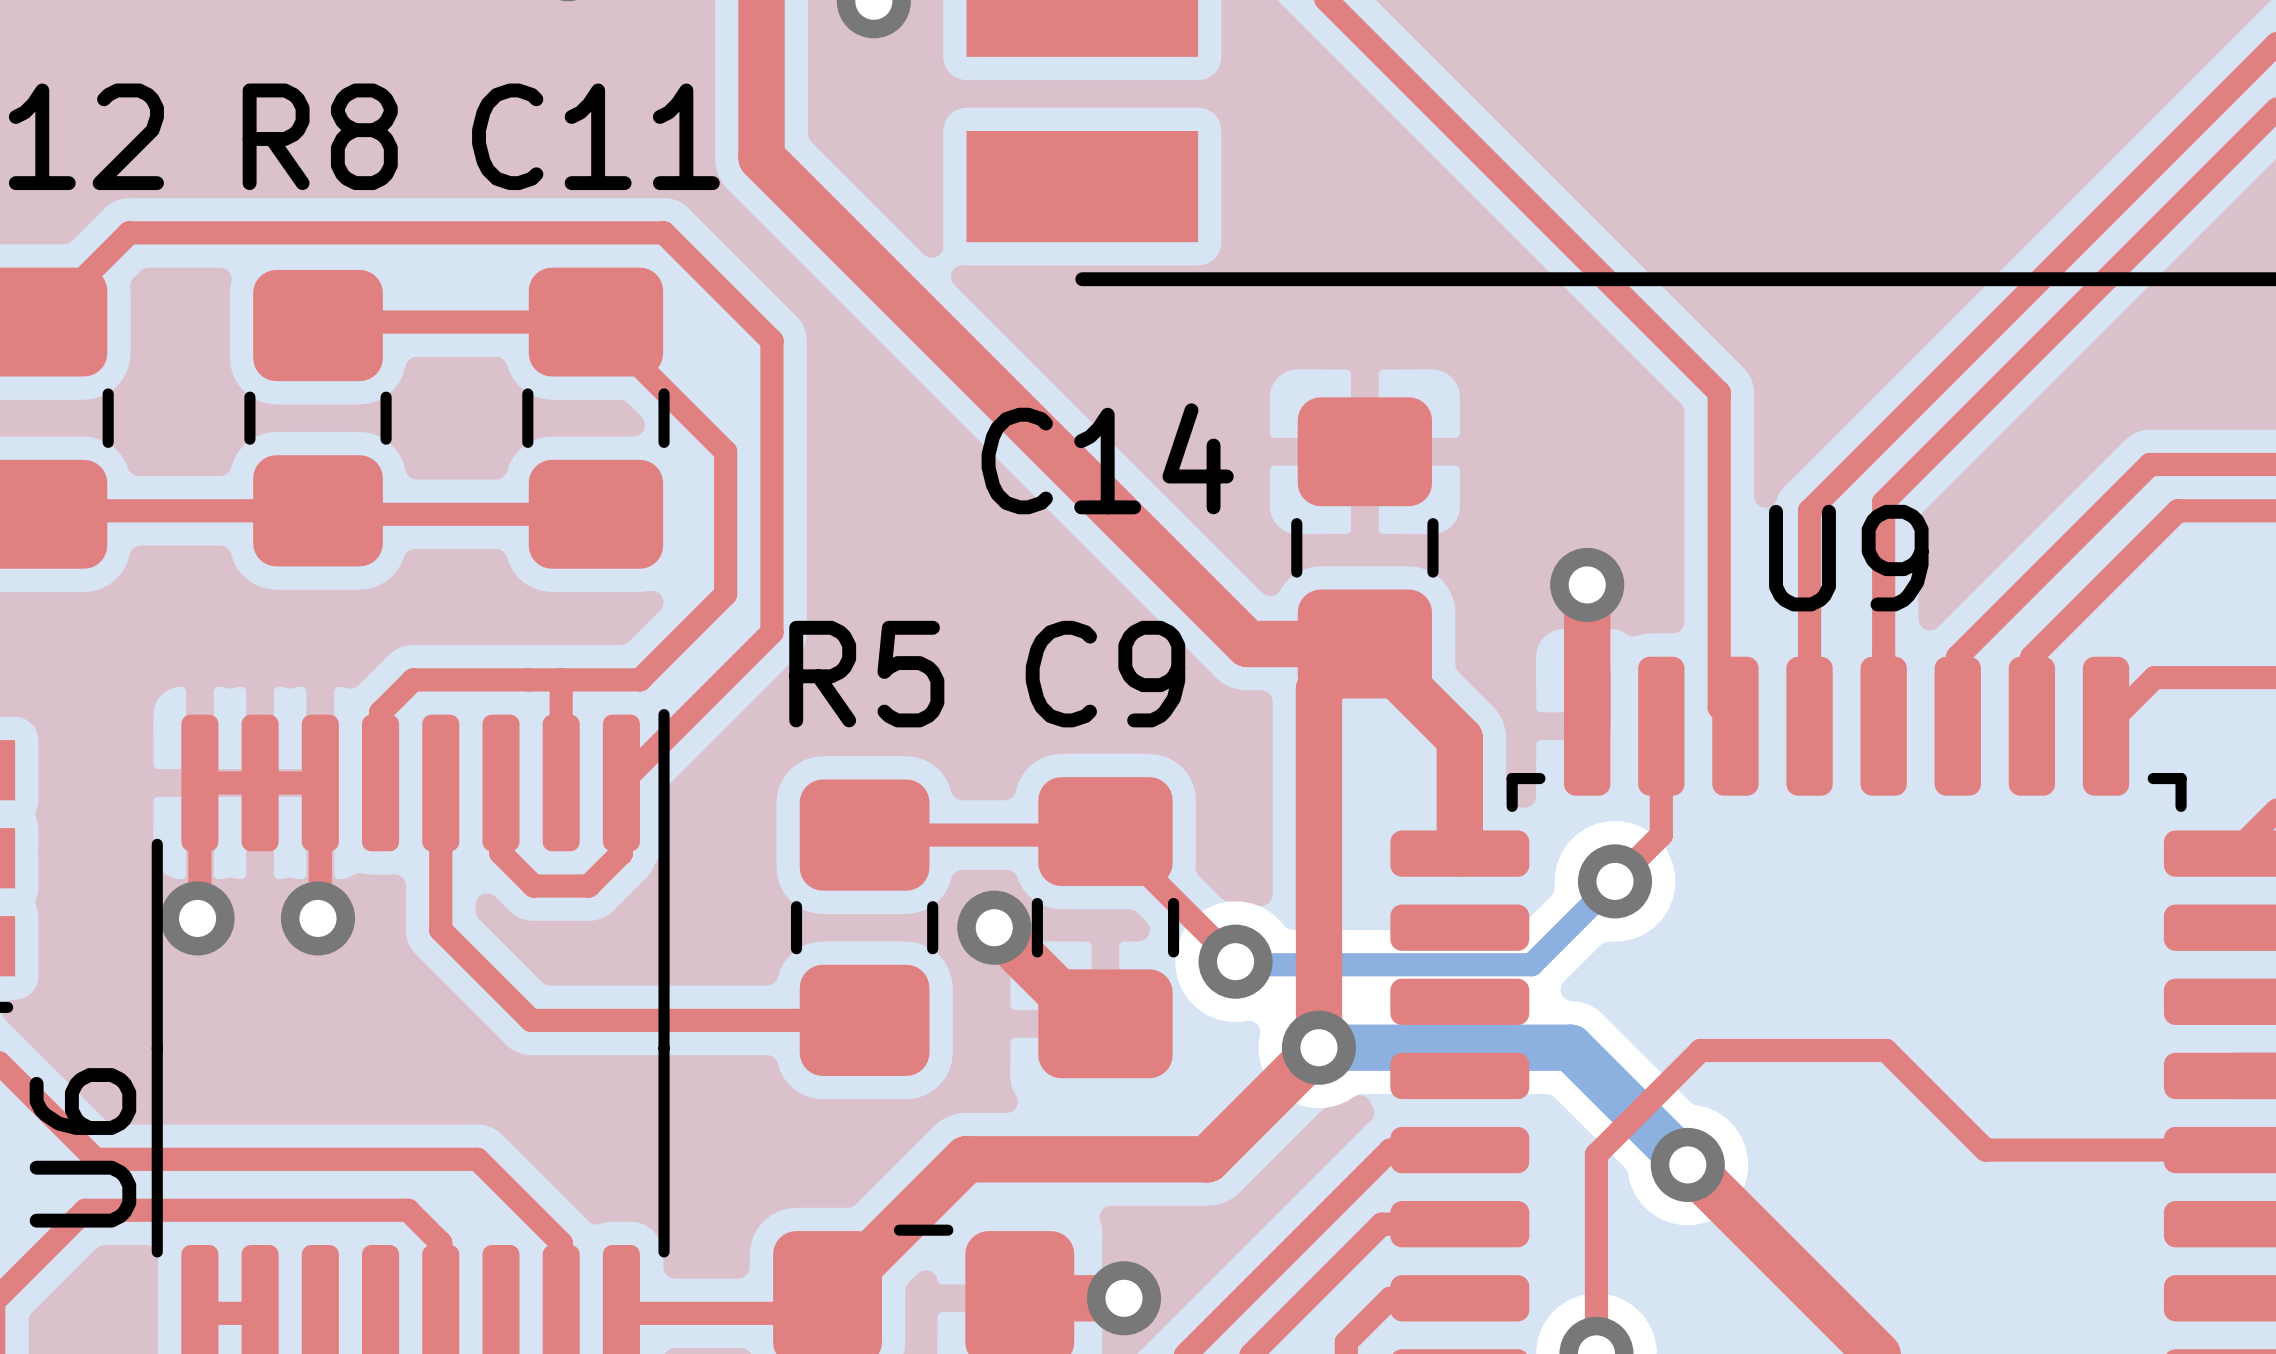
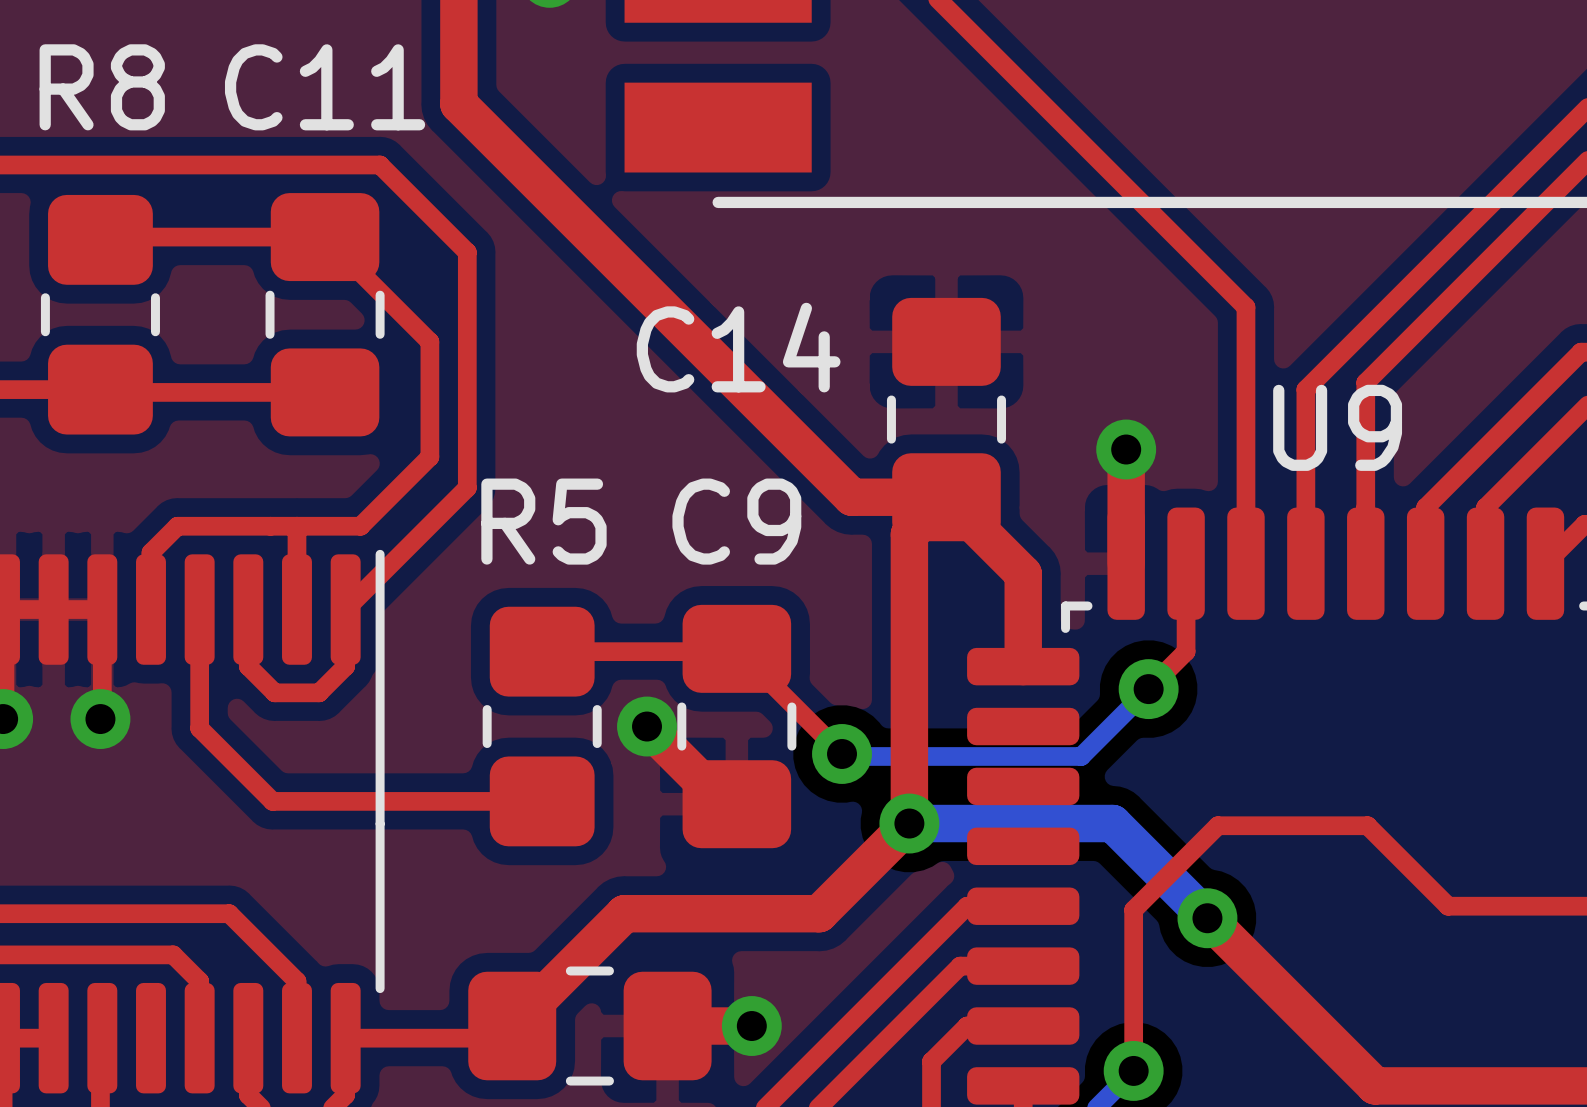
top track: (1719, 392) (1719, 707) (1735, 723) -> (1232, 294) (1245, 307) (1245, 561)

